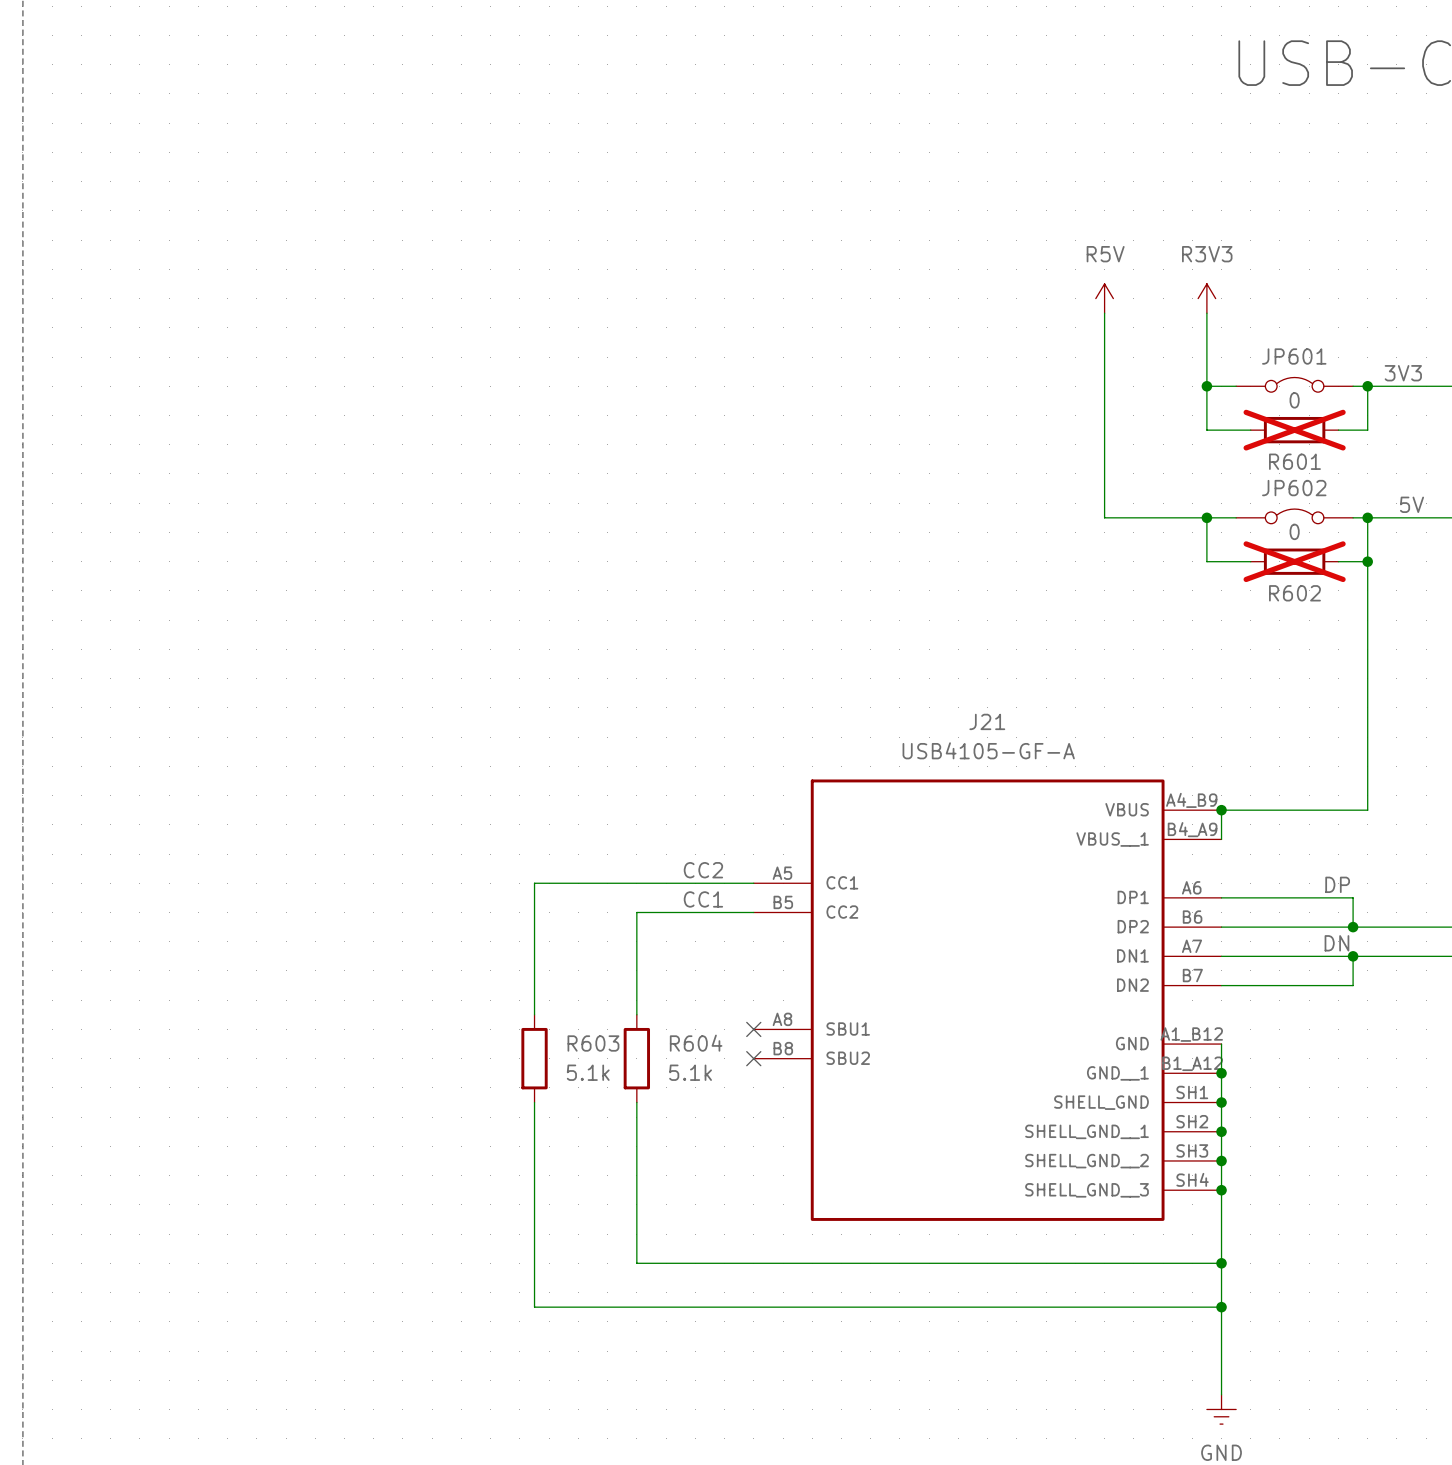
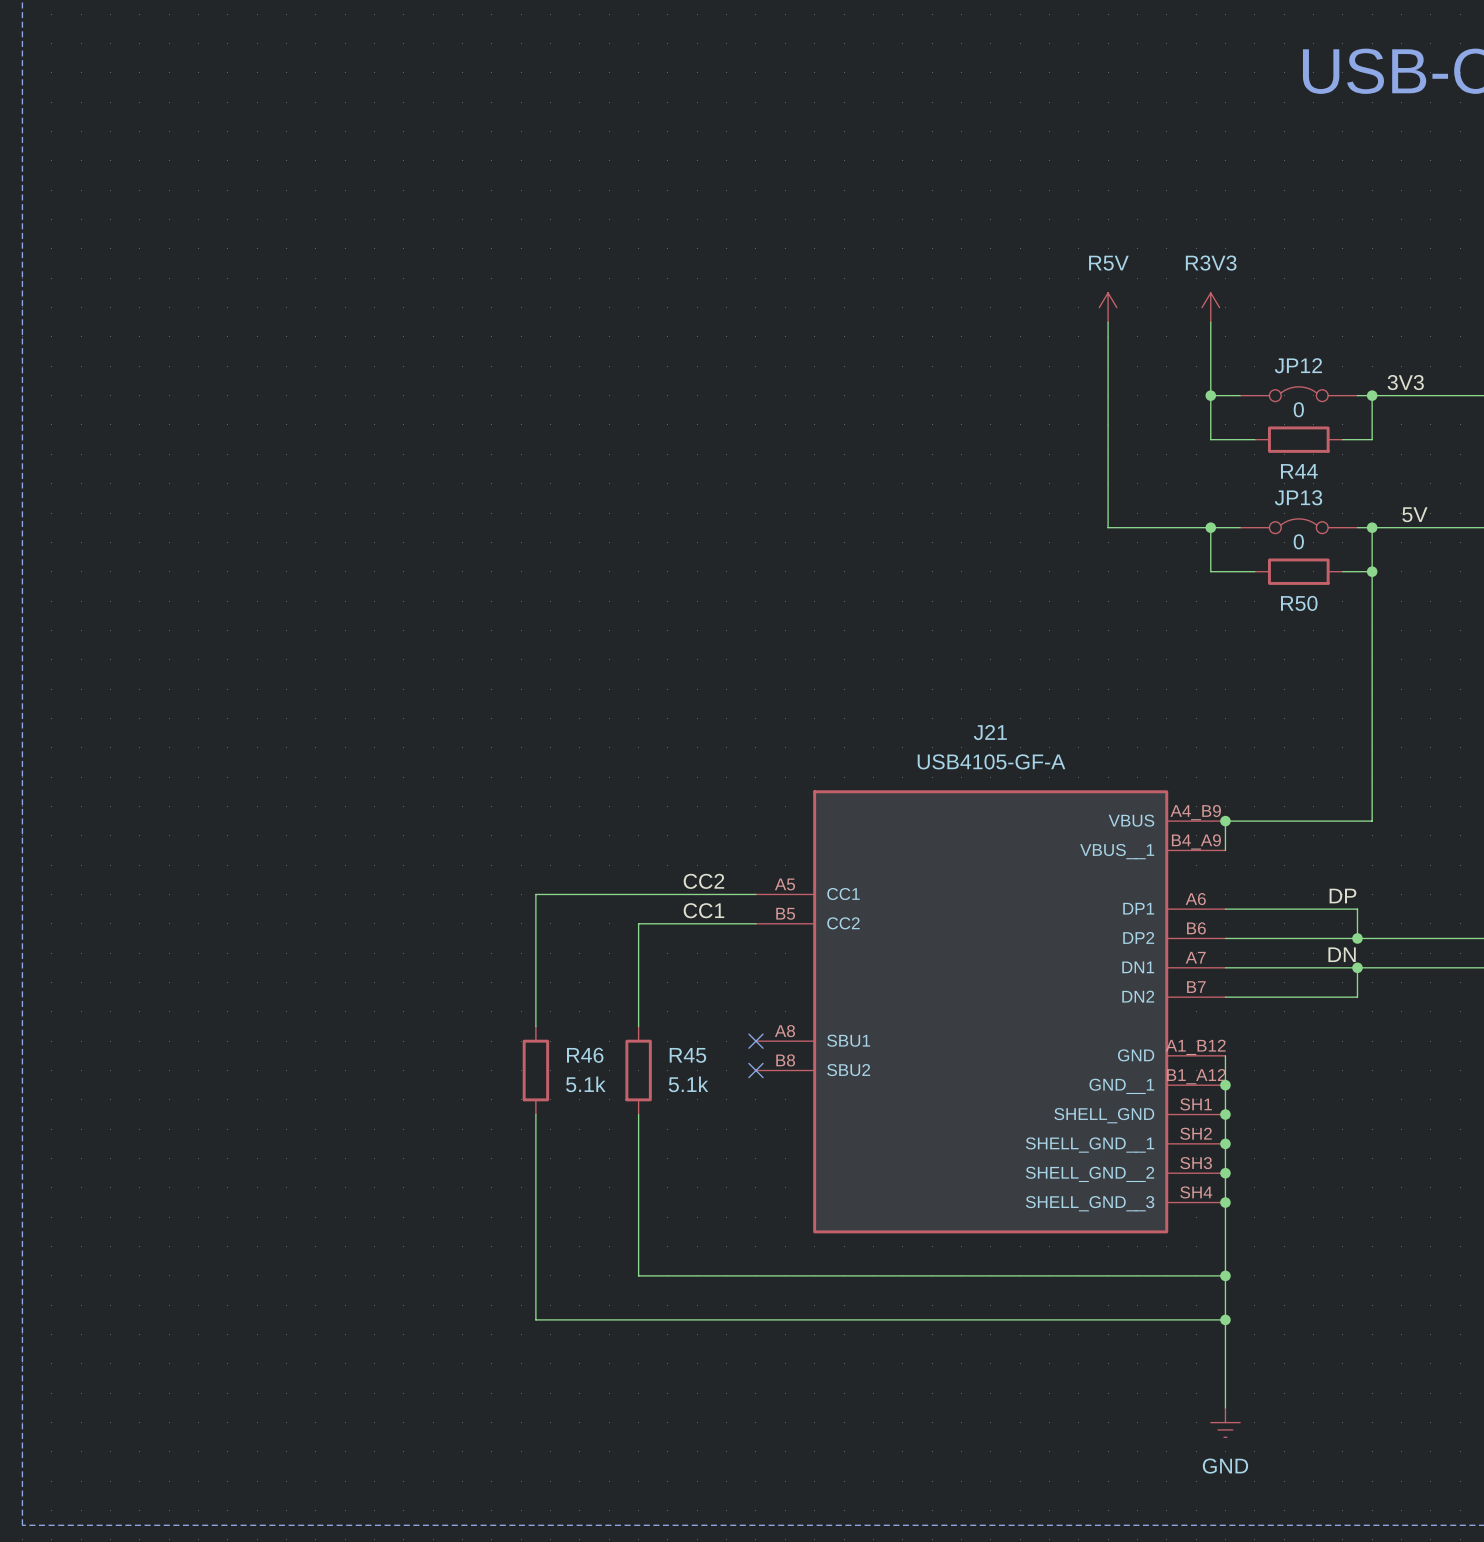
JP601 name: JP601 (1294, 356) -> JP12 (1298, 365)
R601 do-not-place cross: (1294, 430) -> none
R601 name: R601 (1294, 461) -> R44 (1299, 471)
JP602 name: JP602 (1294, 488) -> JP13 (1298, 497)
R602 do-not-place cross: (1294, 561) -> none
R602 name: R602 (1294, 593) -> R50 (1299, 603)
R603 name: R603 (593, 1043) -> R46 (585, 1055)
R604 name: R604 (696, 1043) -> R45 (687, 1055)

